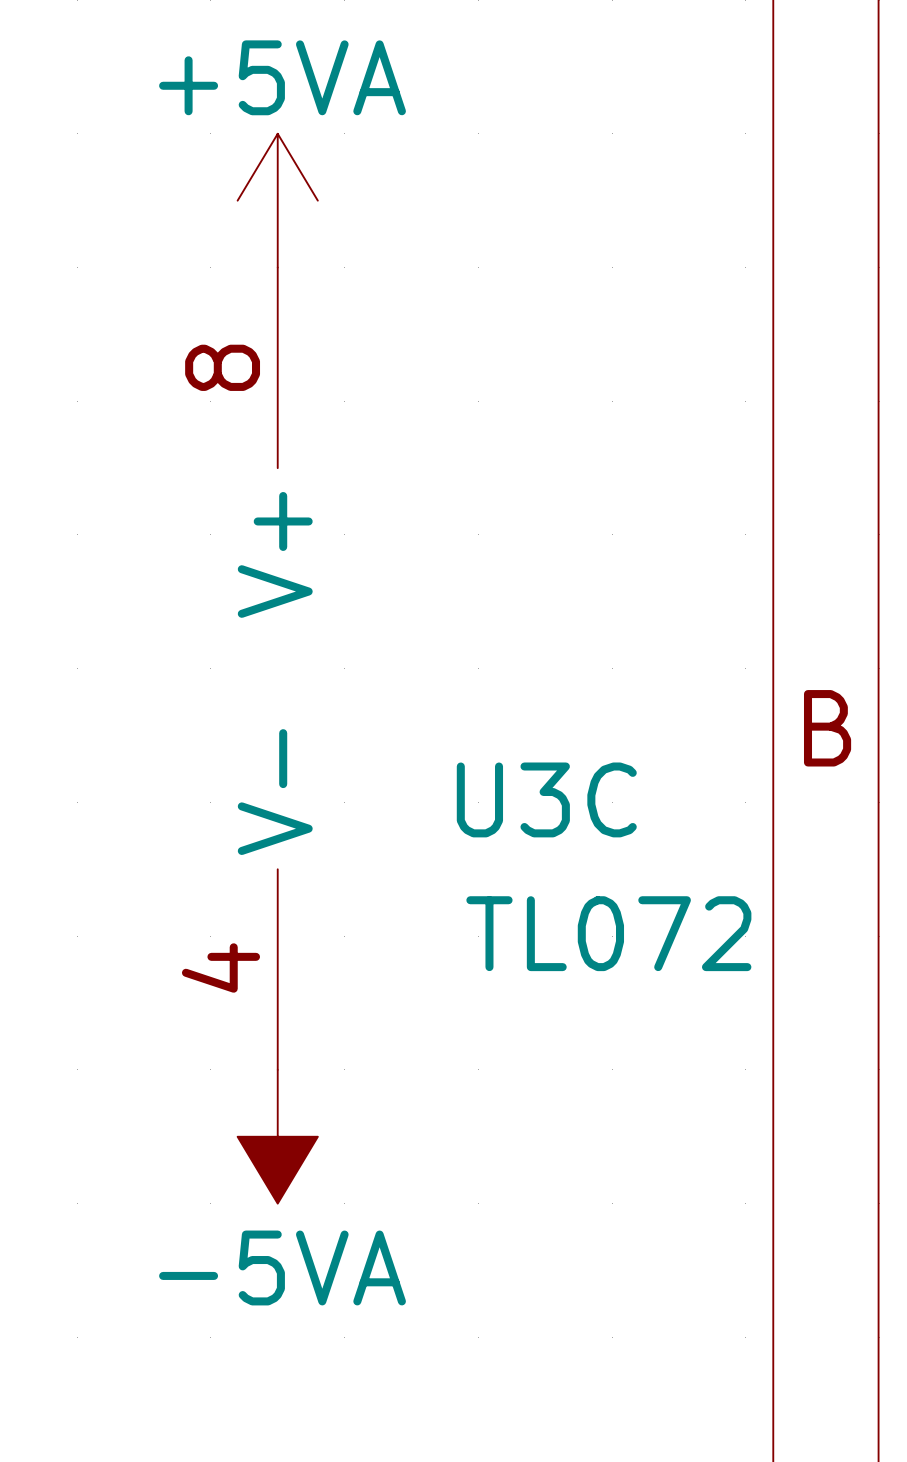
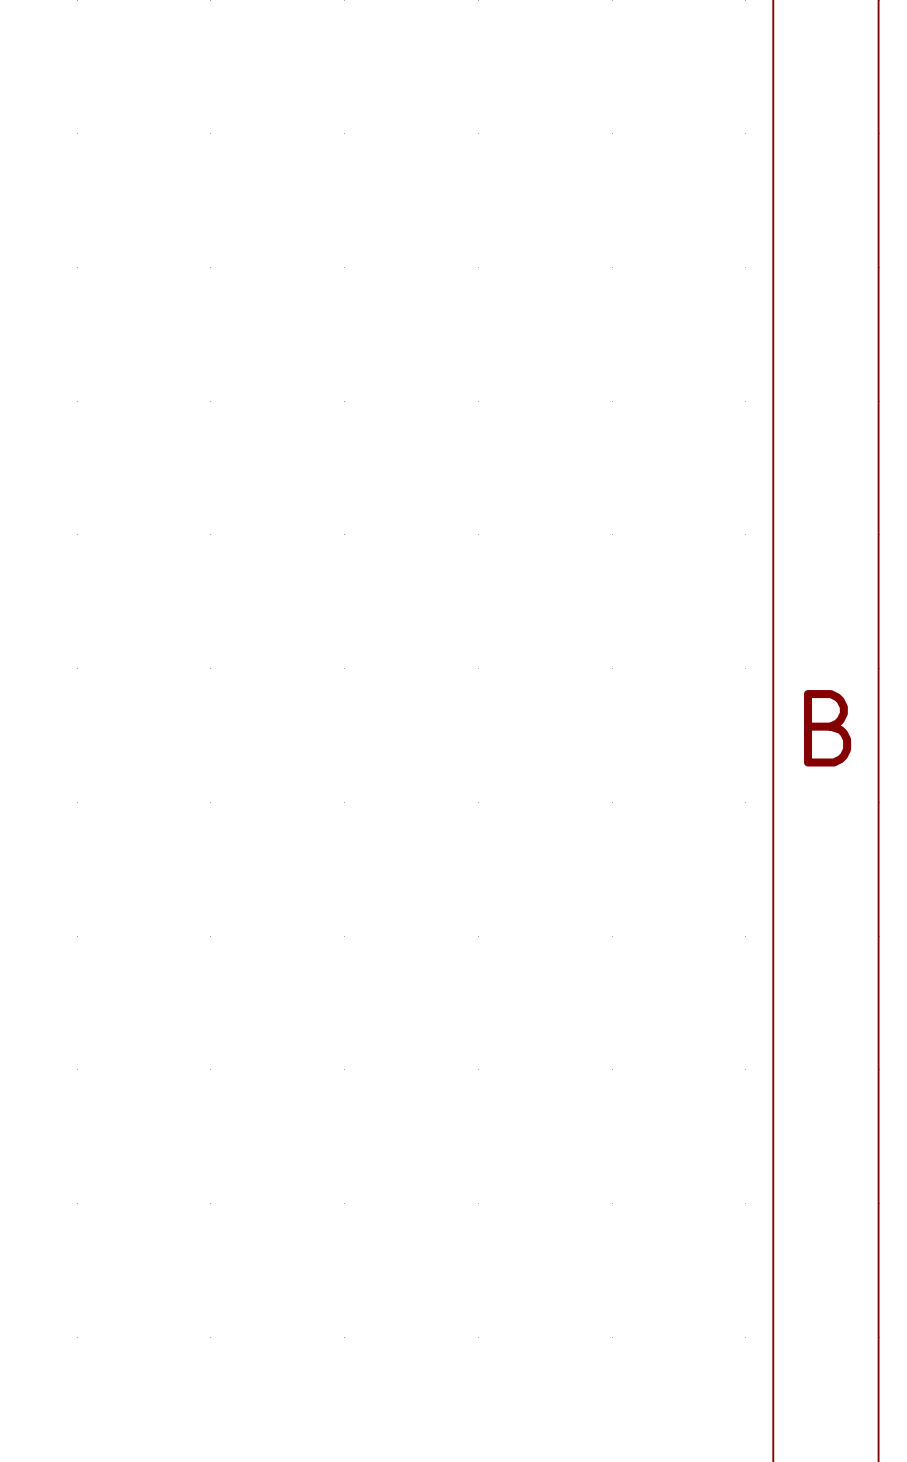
power symbol: +5VA (277, 200) -> none
U3C: (277, 668) -> none
power symbol: -5VA (277, 1136) -> none

